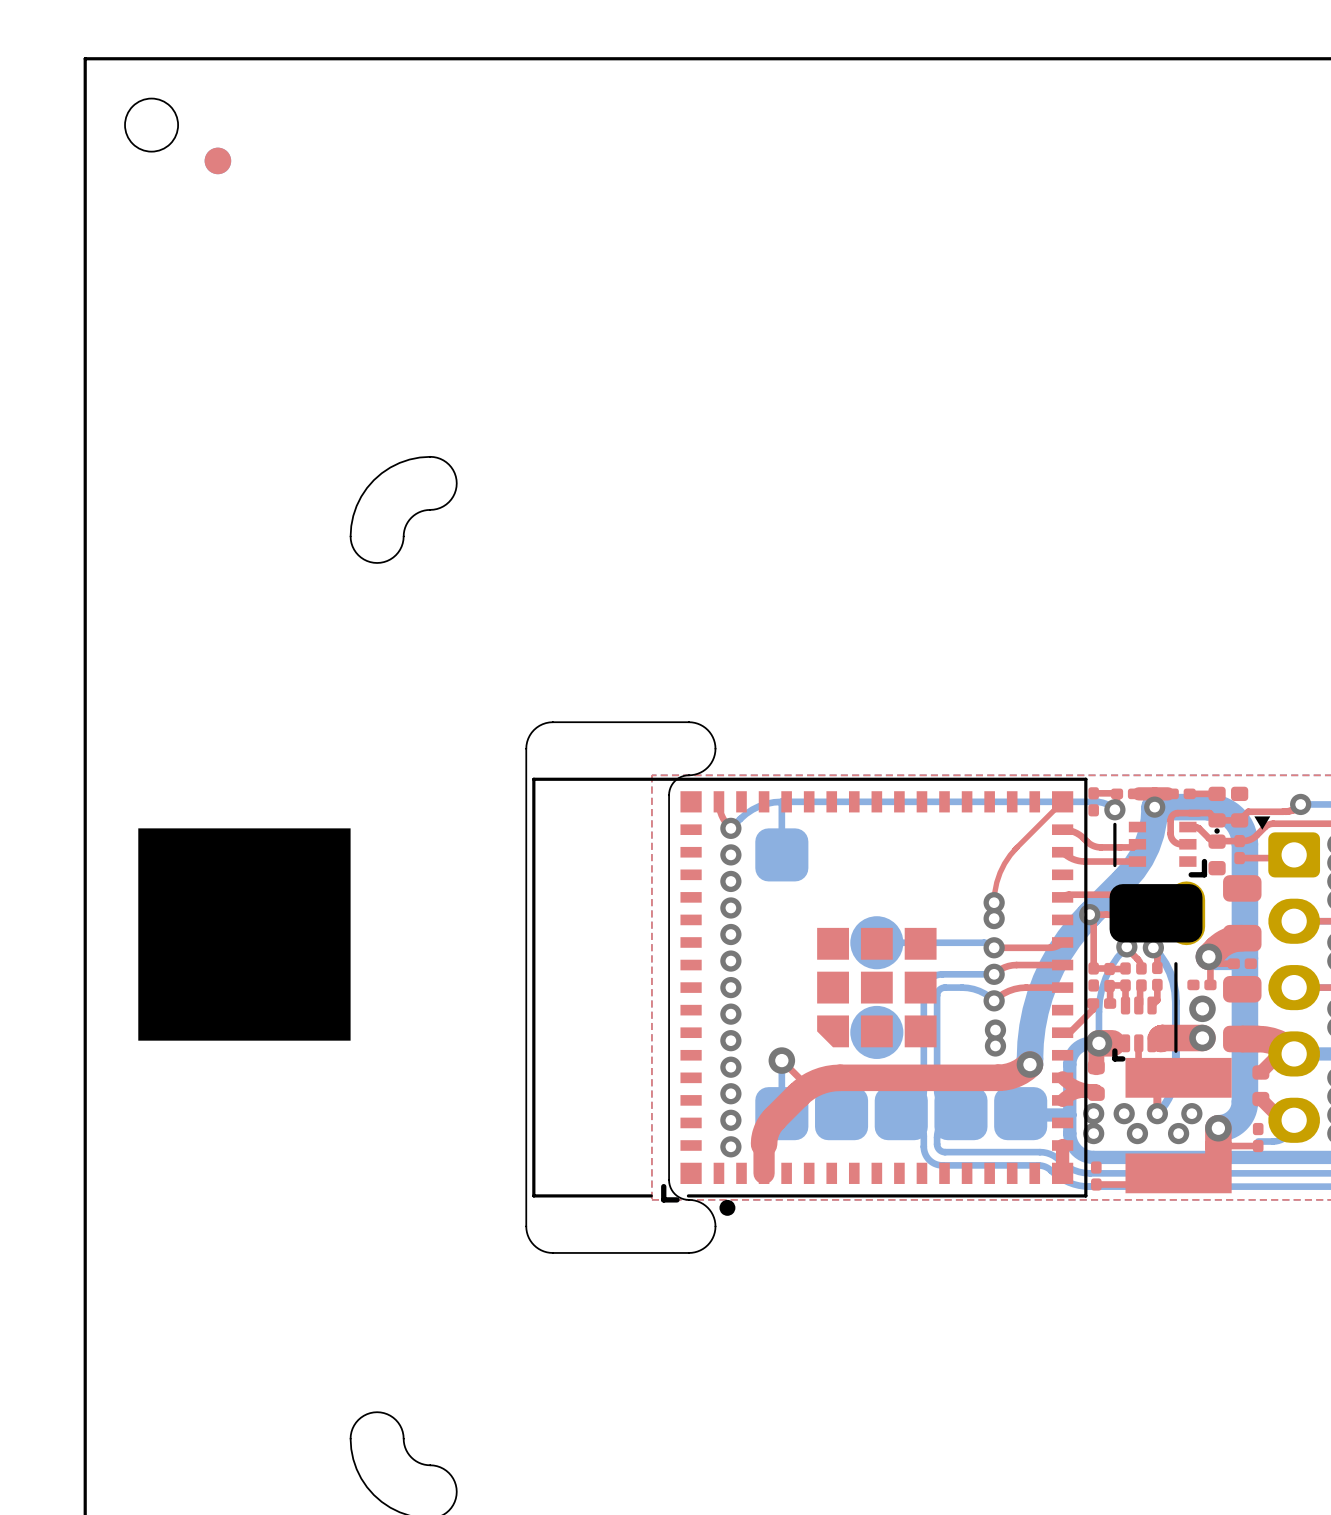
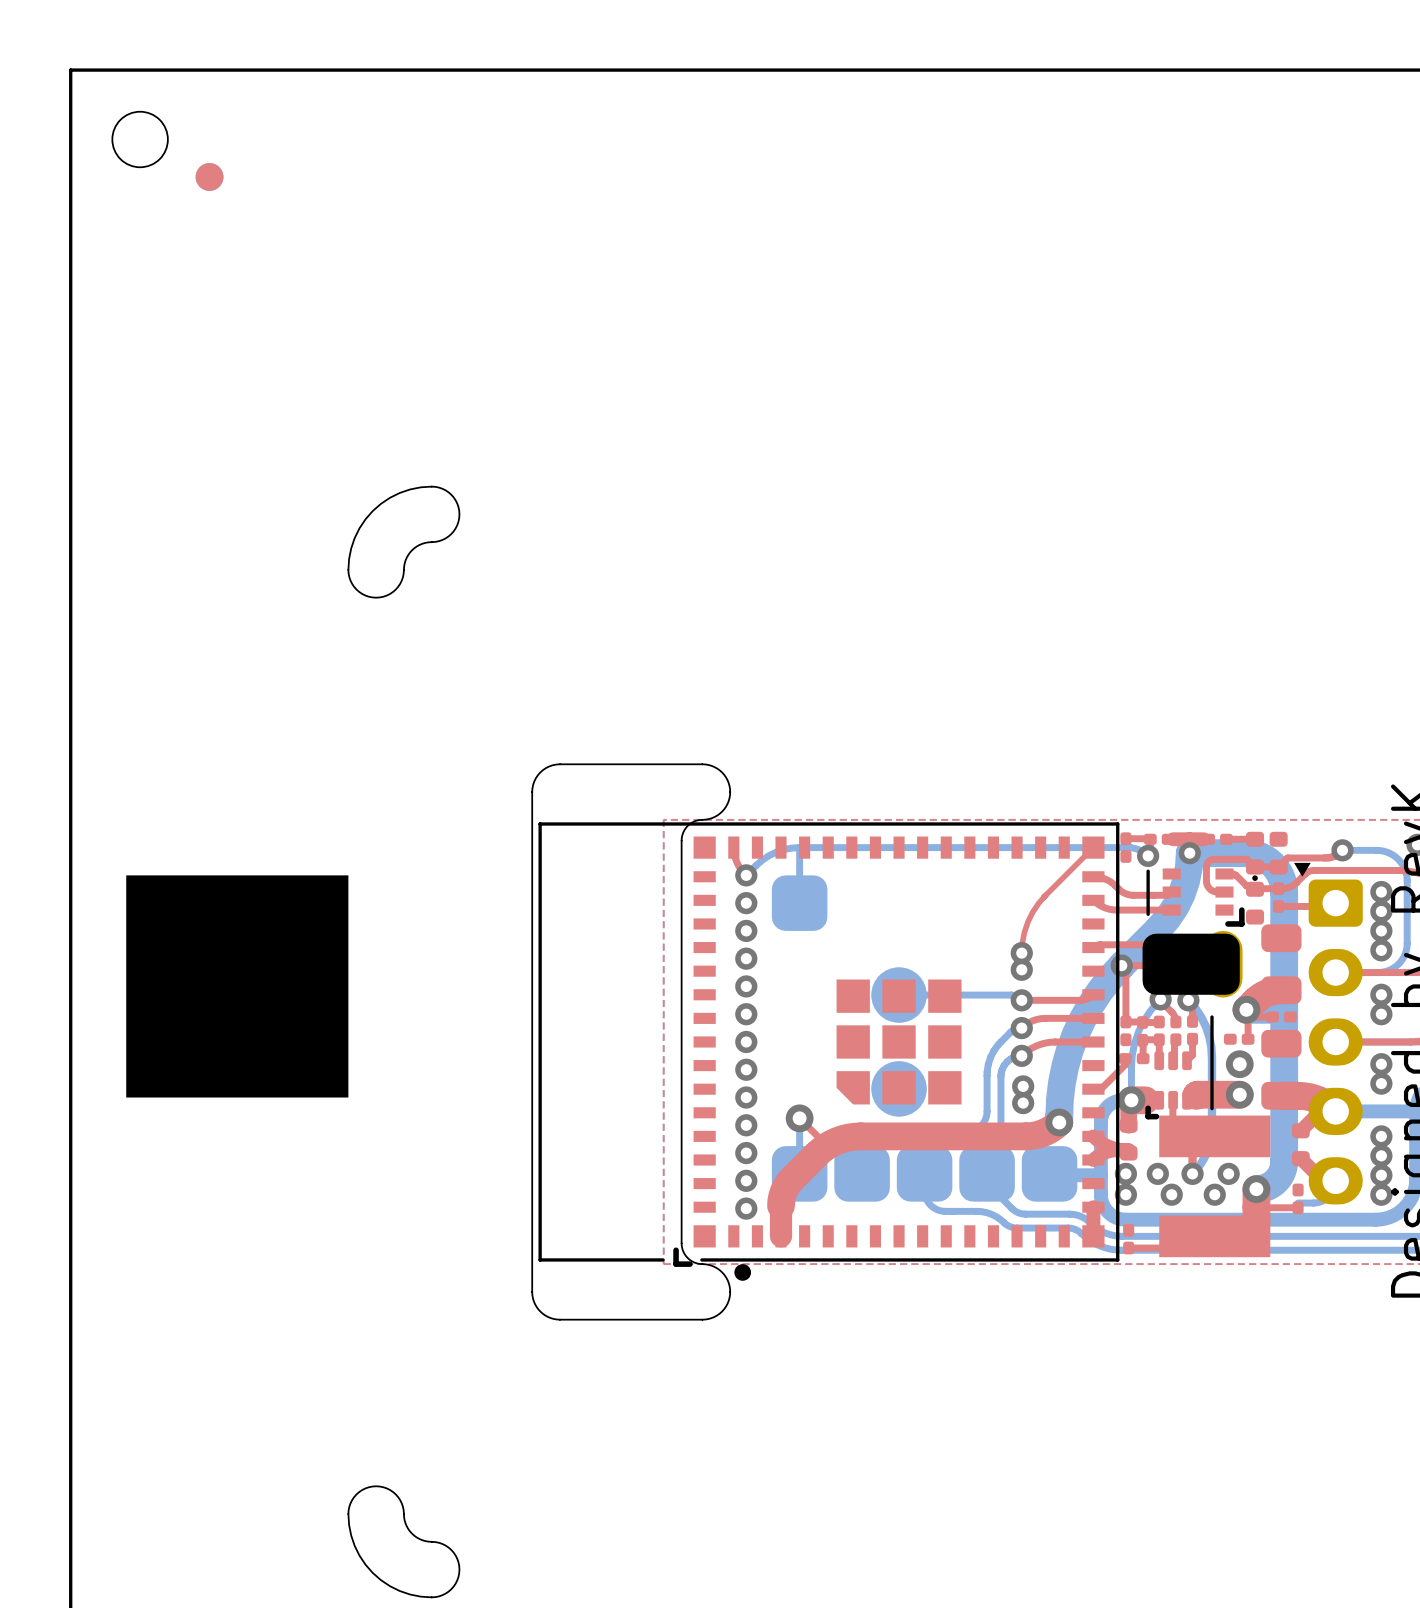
bottom track: (994, 974) (940, 974) (932, 977) (926, 983) (923, 992) (923, 1096) (915, 1108) (901, 1113) (913, 1117) (920, 1124) (923, 1133) (924, 1152) (932, 1162) (942, 1165) (989, 1165) -> (1021, 1028) (1011, 1031) (998, 1044) (990, 1057) (987, 1071) (987, 1111) (984, 1121) (974, 1130) (955, 1133) (940, 1140) (930, 1153) (924, 1173)
bottom track: (994, 1000) (984, 993) (968, 987) (944, 987) (937, 992) (937, 1092) (944, 1106) (951, 1111) (960, 1113) (949, 1116) (942, 1122) (937, 1131) (937, 1144) (938, 1149) (944, 1152) (997, 1152) -> (1021, 1055) (1014, 1056) (1006, 1061) (1001, 1074) (1000, 1173)
bottom track: none -> (924, 1190) (928, 1203) (937, 1209) (986, 1212) (995, 1216) (1007, 1225) (1017, 1228)
bottom track: none -> (993, 1190) (1013, 1210) (1025, 1214)

